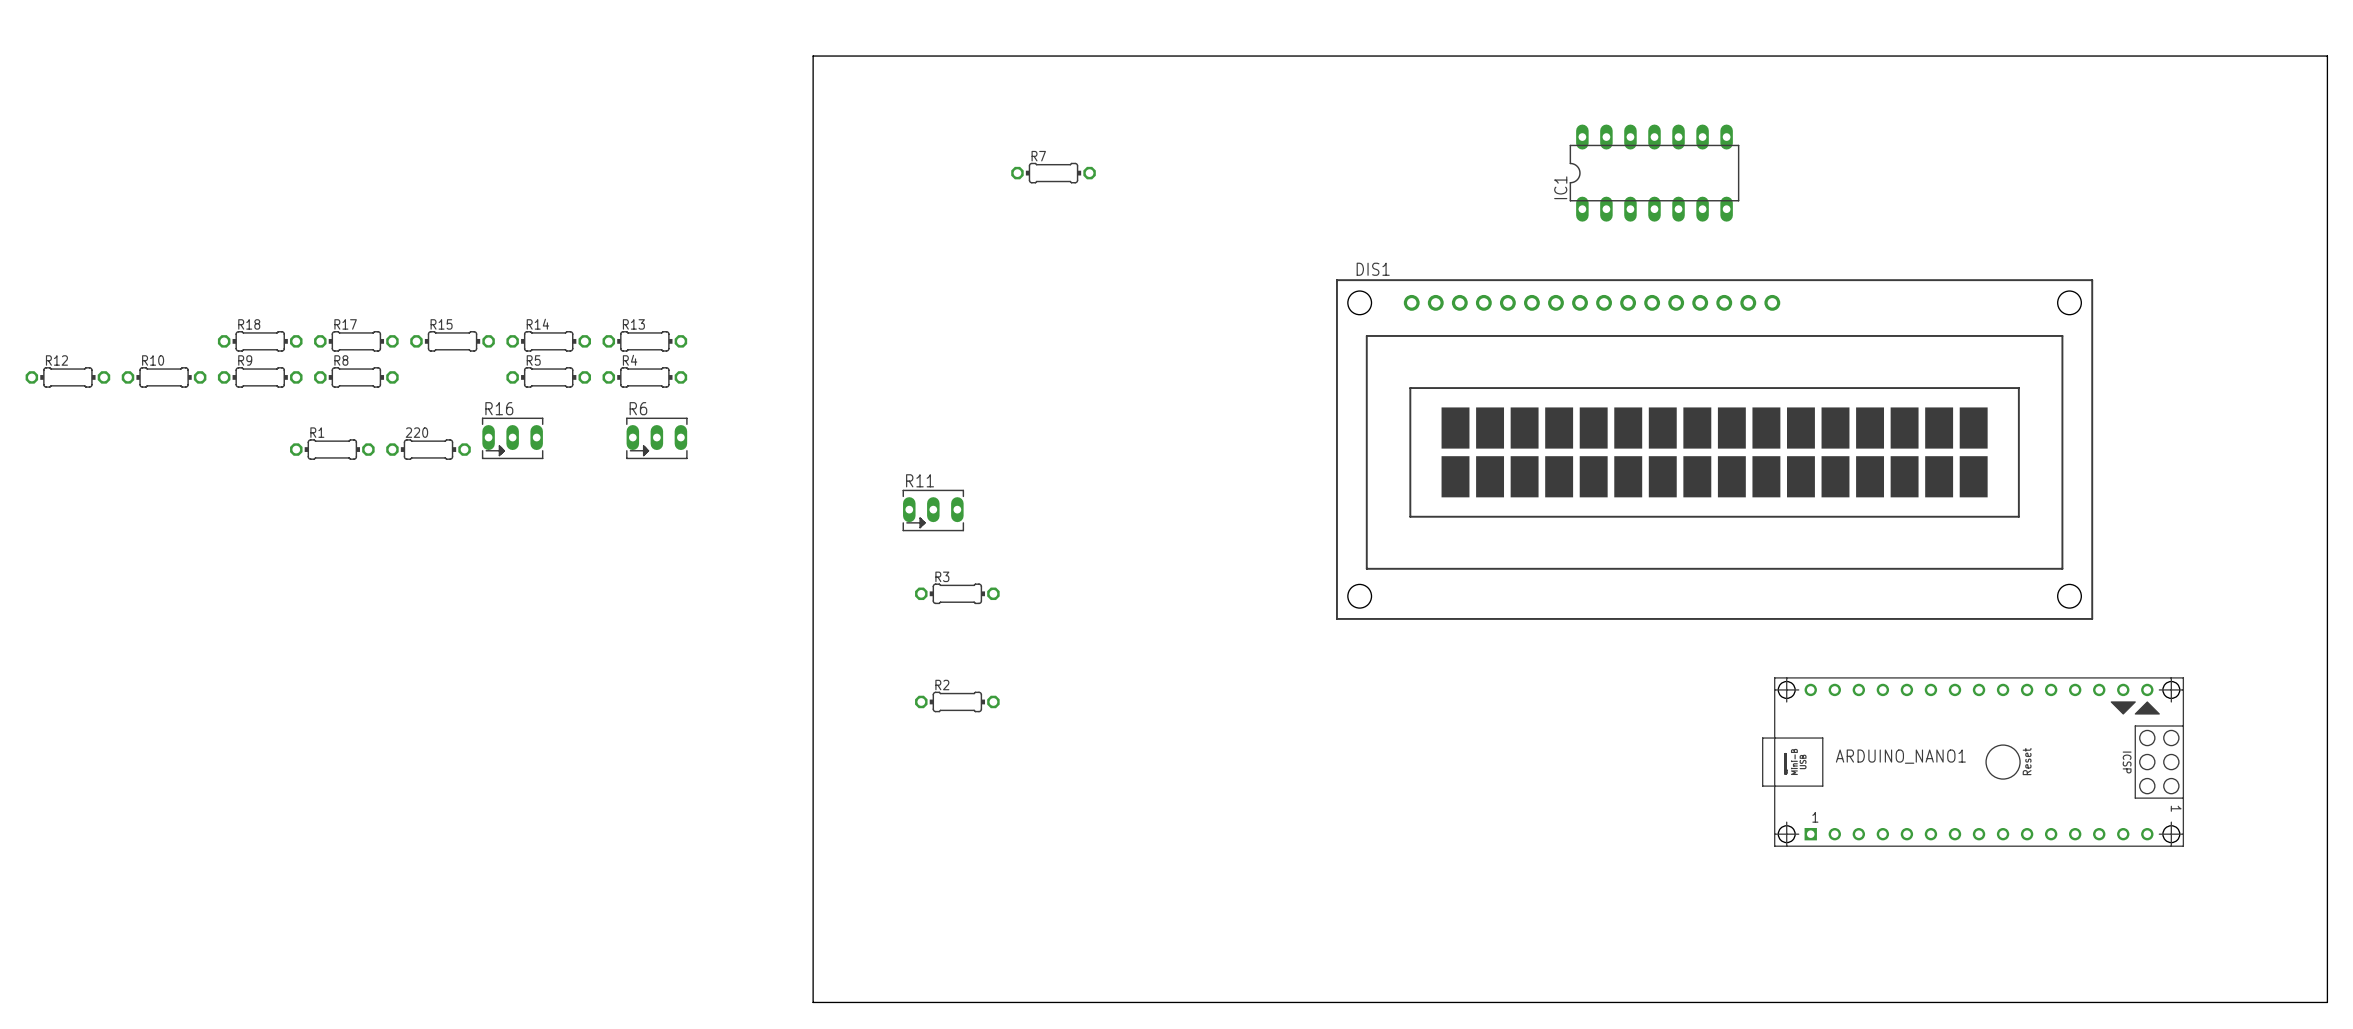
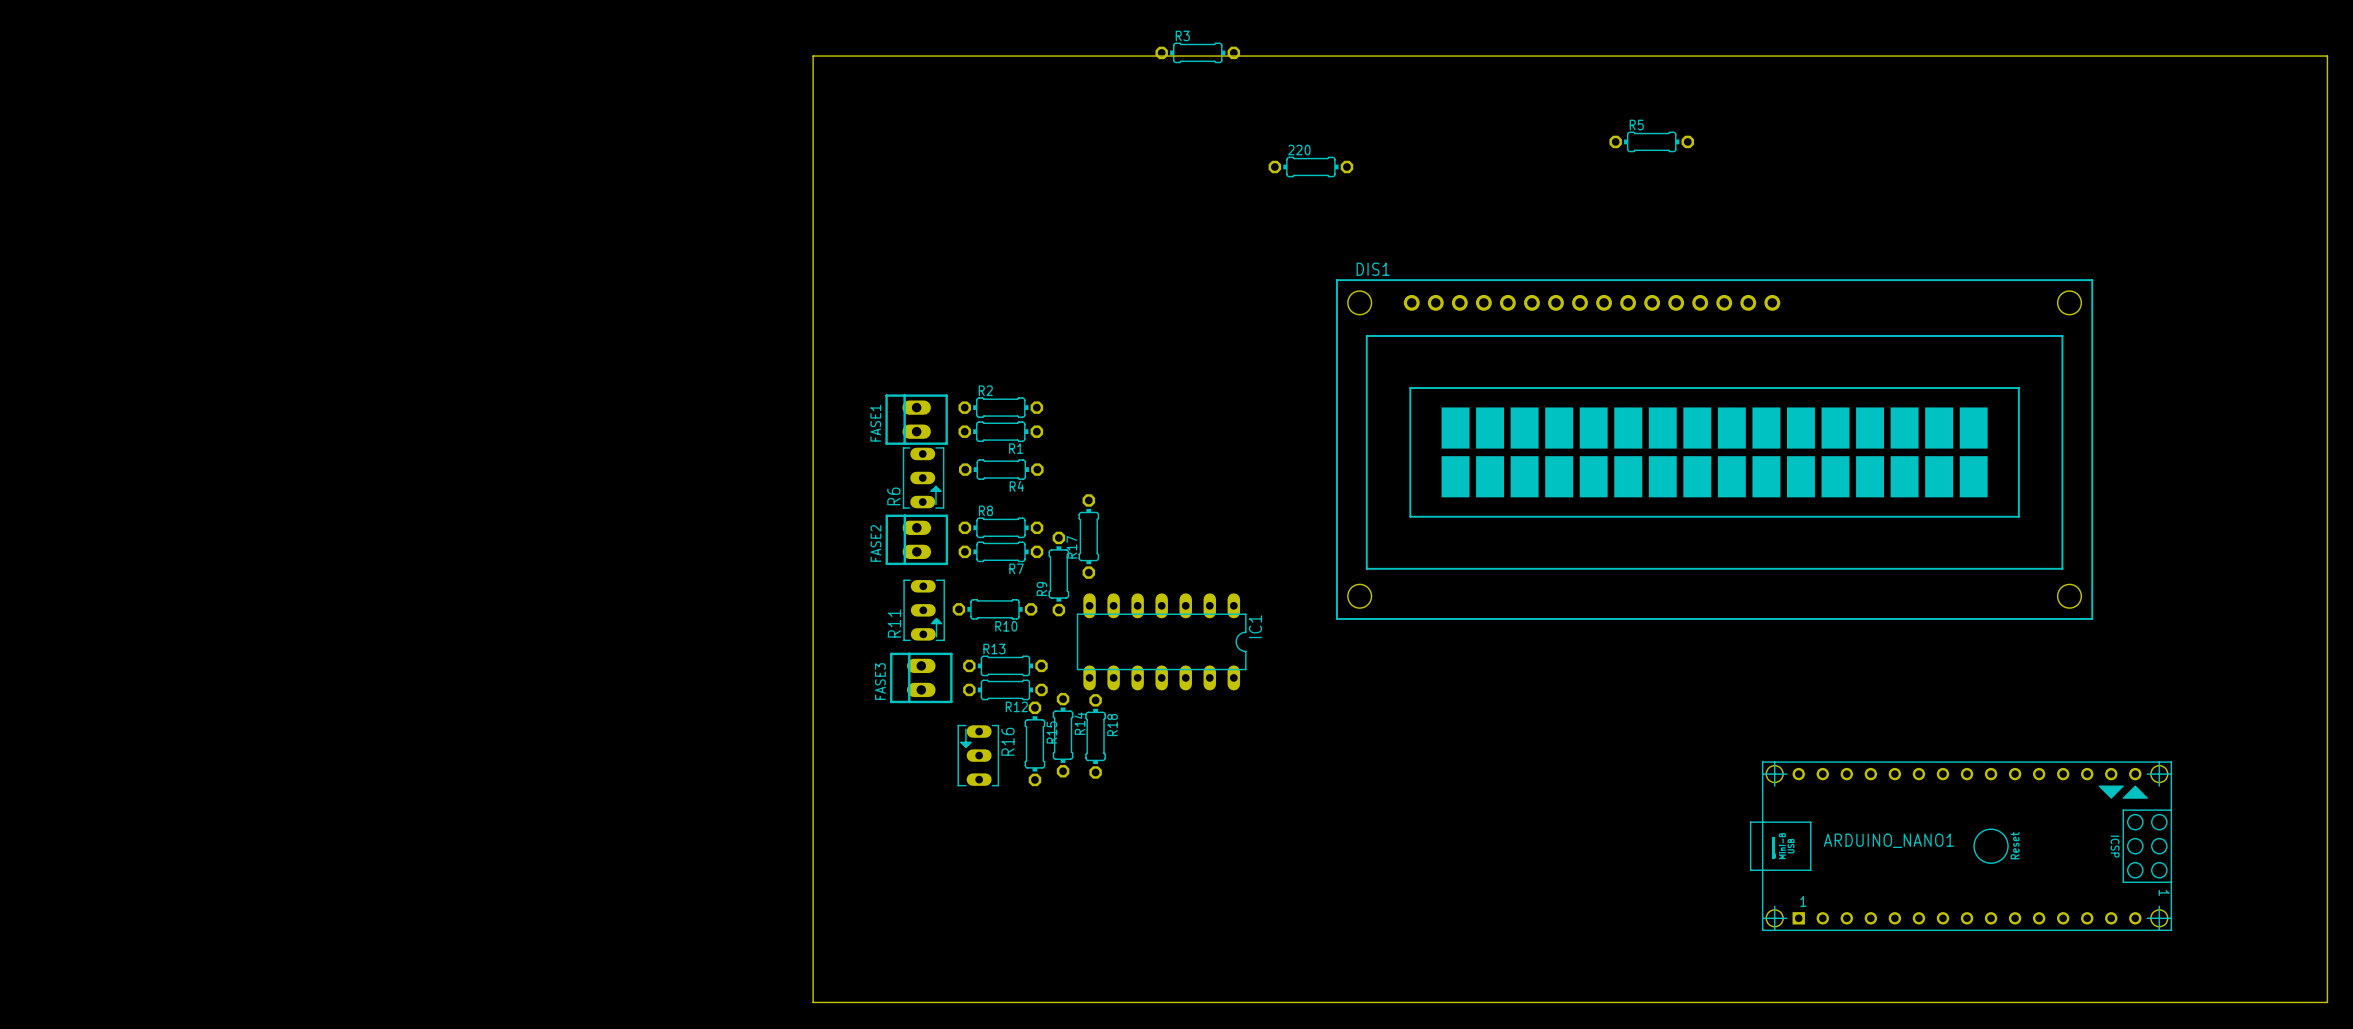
R7 name position: R7 (1038, 156) -> R7 (1016, 568)
R7 position: (1053, 173) -> (1000, 551)
IC1 rotation: 0° (1654, 173) -> 180° (1161, 641)
IC1 position: (1654, 173) -> (1161, 641)
R17 name position: R17 (345, 324) -> R17 (1071, 547)
R18 rotation: 0° (260, 341) -> 90° clockwise (1095, 736)
R18 position: (260, 341) -> (1095, 736)
R17 rotation: 0° (356, 341) -> 90° clockwise (1088, 536)
R17 position: (356, 341) -> (1088, 536)
R15 rotation: 0° (452, 341) -> 90° clockwise (1034, 743)
R15 position: (452, 341) -> (1034, 743)
R14 rotation: 0° (548, 341) -> 90° clockwise (1063, 735)
R14 position: (548, 341) -> (1063, 735)
R13 position: (644, 341) -> (1005, 665)
R12 name position: R12 (56, 360) -> R12 (1016, 706)
R10 name position: R10 (153, 360) -> R10 (1006, 626)
R9 name position: R9 (245, 360) -> R9 (1041, 588)
R4 name position: R4 (630, 360) -> R4 (1016, 486)
R12 position: (67, 377) -> (1005, 689)
R10 position: (164, 377) -> (994, 609)
R9 rotation: 0° (260, 377) -> 90° clockwise (1058, 573)
R9 position: (260, 377) -> (1058, 573)
R8 position: (356, 377) -> (1000, 527)
R5 position: (548, 377) -> (1651, 141)
R4 position: (644, 377) -> (1001, 469)
FASE1: none -> (916, 419)
R1 name position: R1 (317, 432) -> R1 (1016, 448)
R16 rotation: 0° (512, 438) -> 90° clockwise (978, 755)
R16 position: (512, 438) -> (978, 755)
R6 rotation: 0° (656, 438) -> 90° counterclockwise (923, 477)
R6 position: (656, 438) -> (923, 477)
R1 position: (332, 449) -> (1000, 431)
220 position: (428, 449) -> (1310, 166)
R11 rotation: 0° (933, 510) -> 90° counterclockwise (924, 610)
R11 position: (933, 510) -> (924, 610)
FASE2: none -> (916, 539)
R3 position: (957, 593) -> (1197, 52)
FASE3: none -> (921, 677)
R2 position: (957, 701) -> (1000, 407)
ARDUINO_NANO1 position: (1973, 762) -> (1960, 846)

